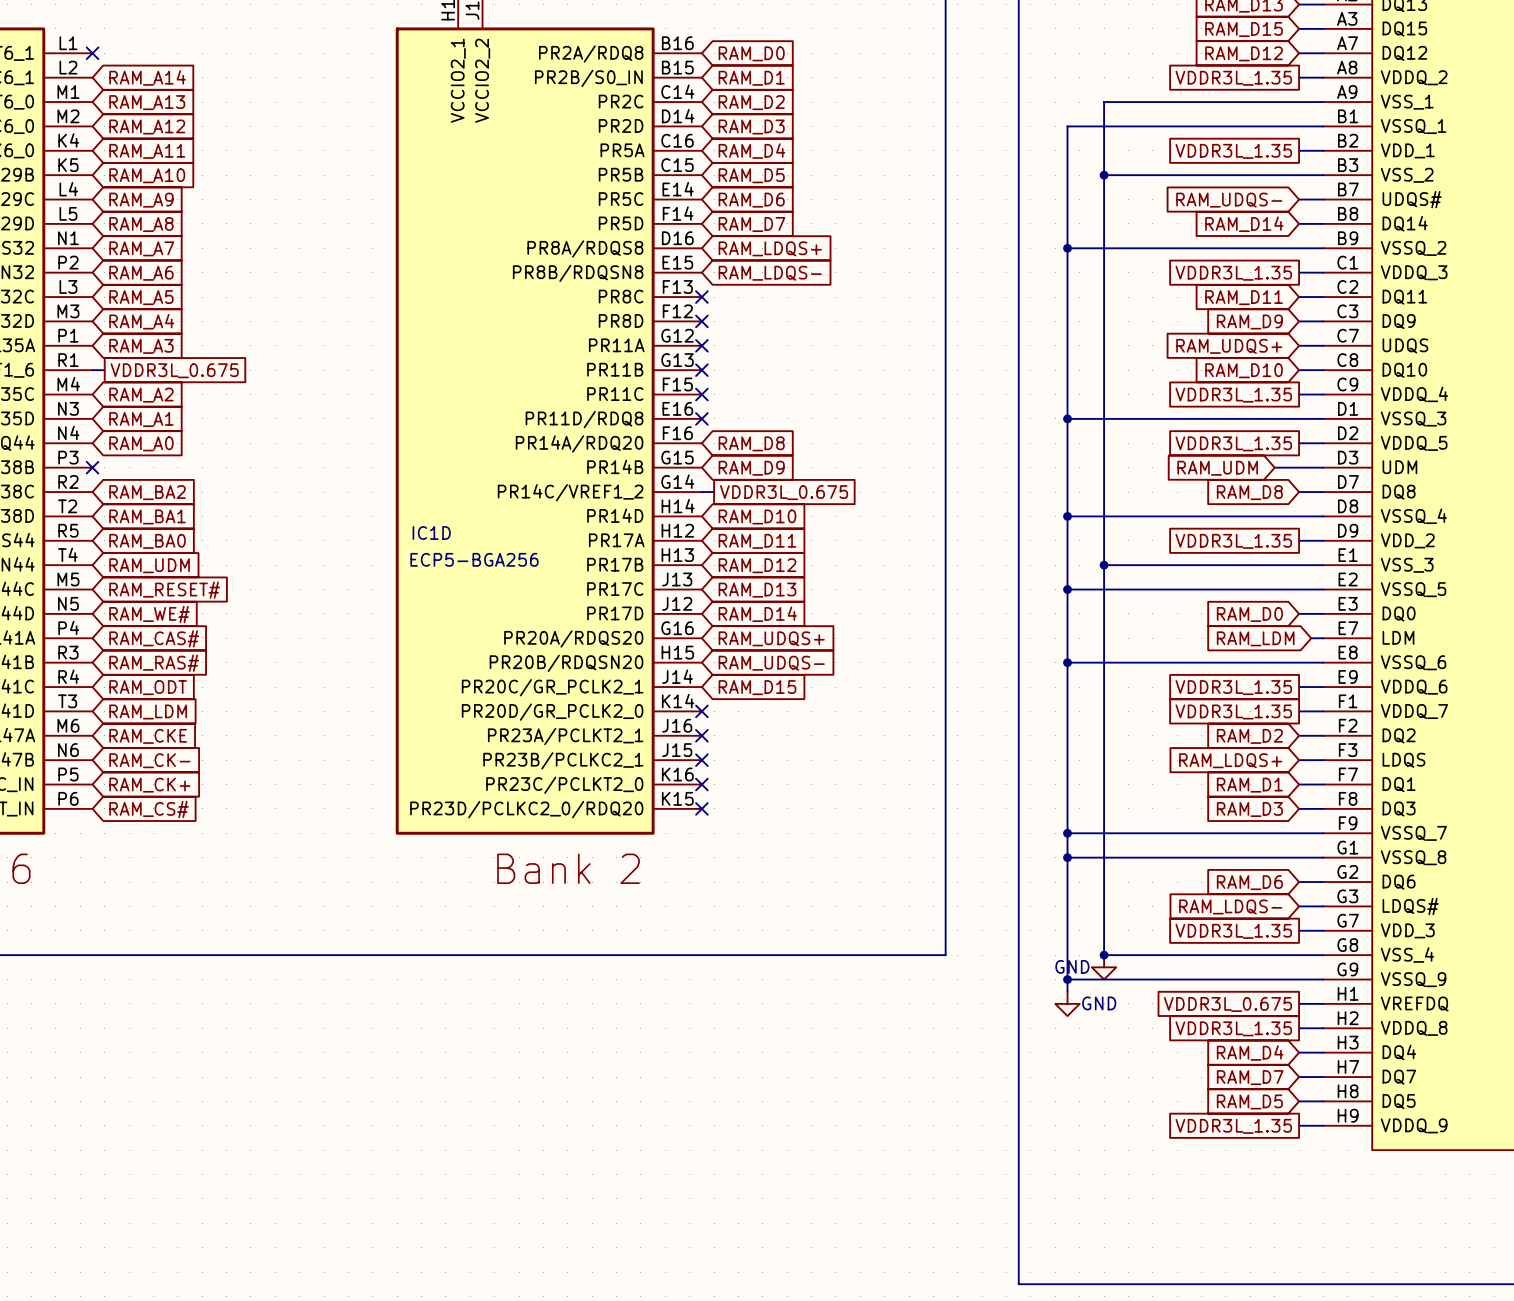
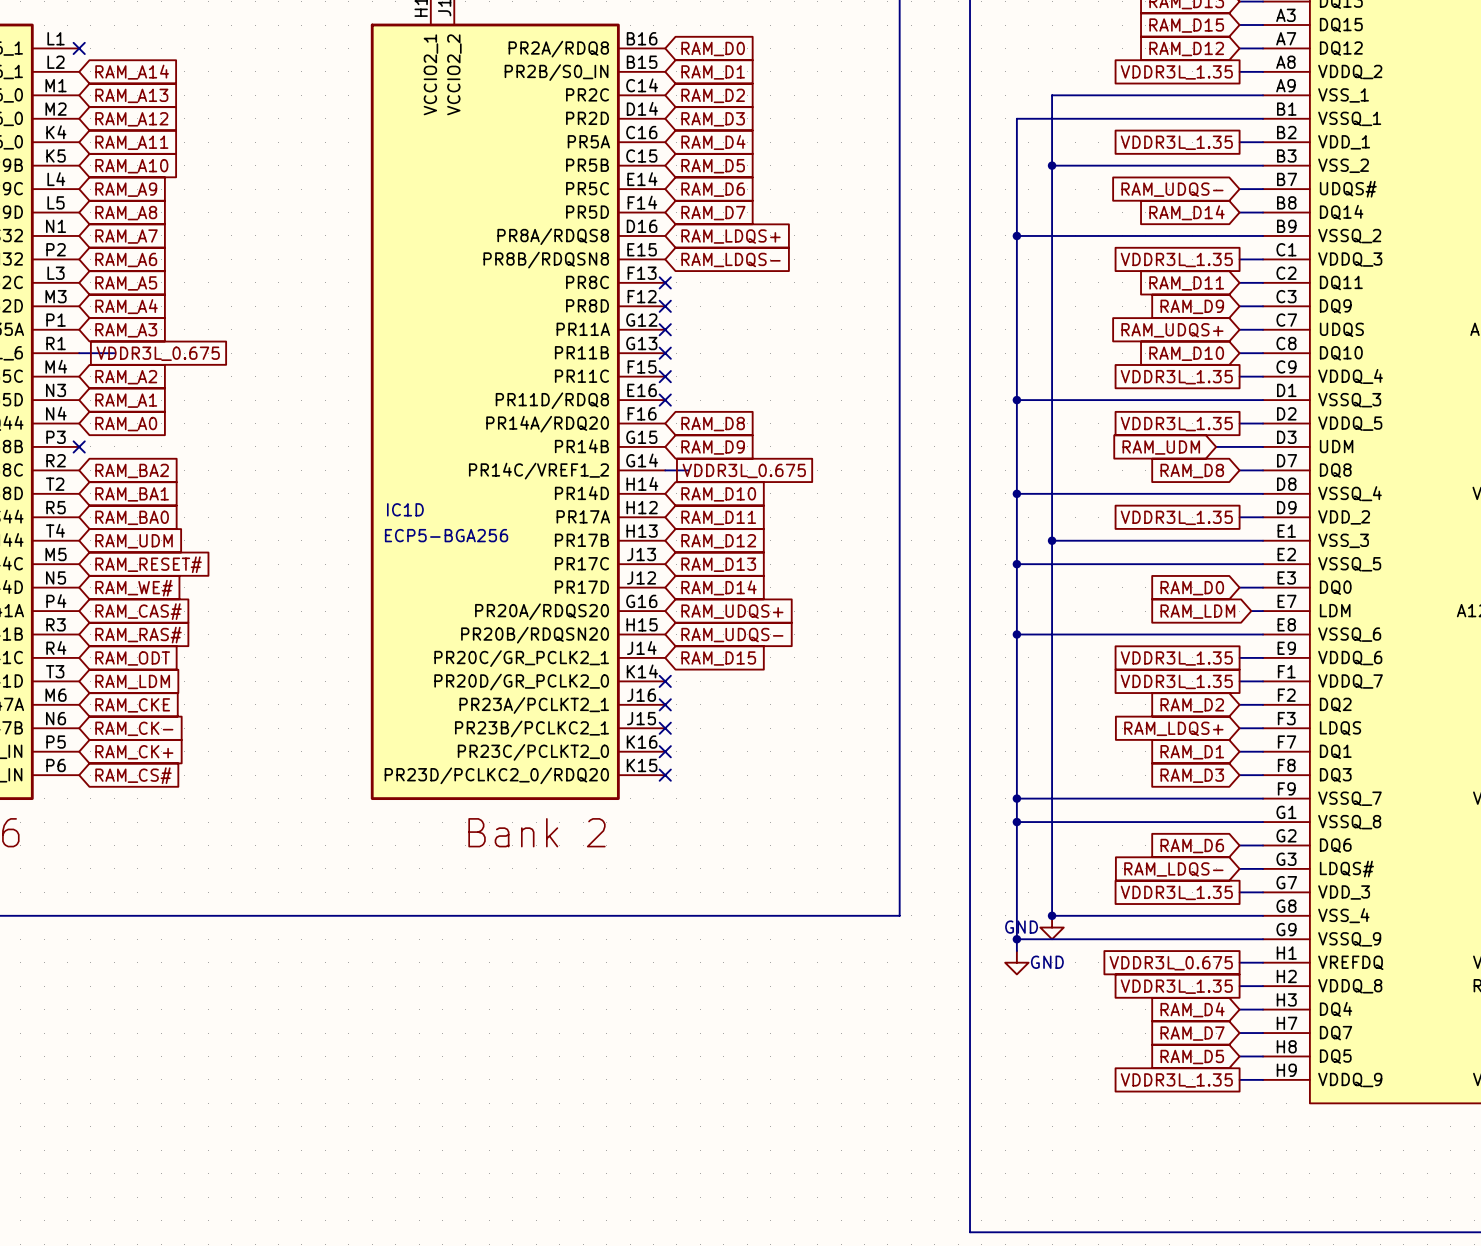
wire: none -> (90, 353) (114, 353)
wire: none -> (676, 470) (688, 470)

